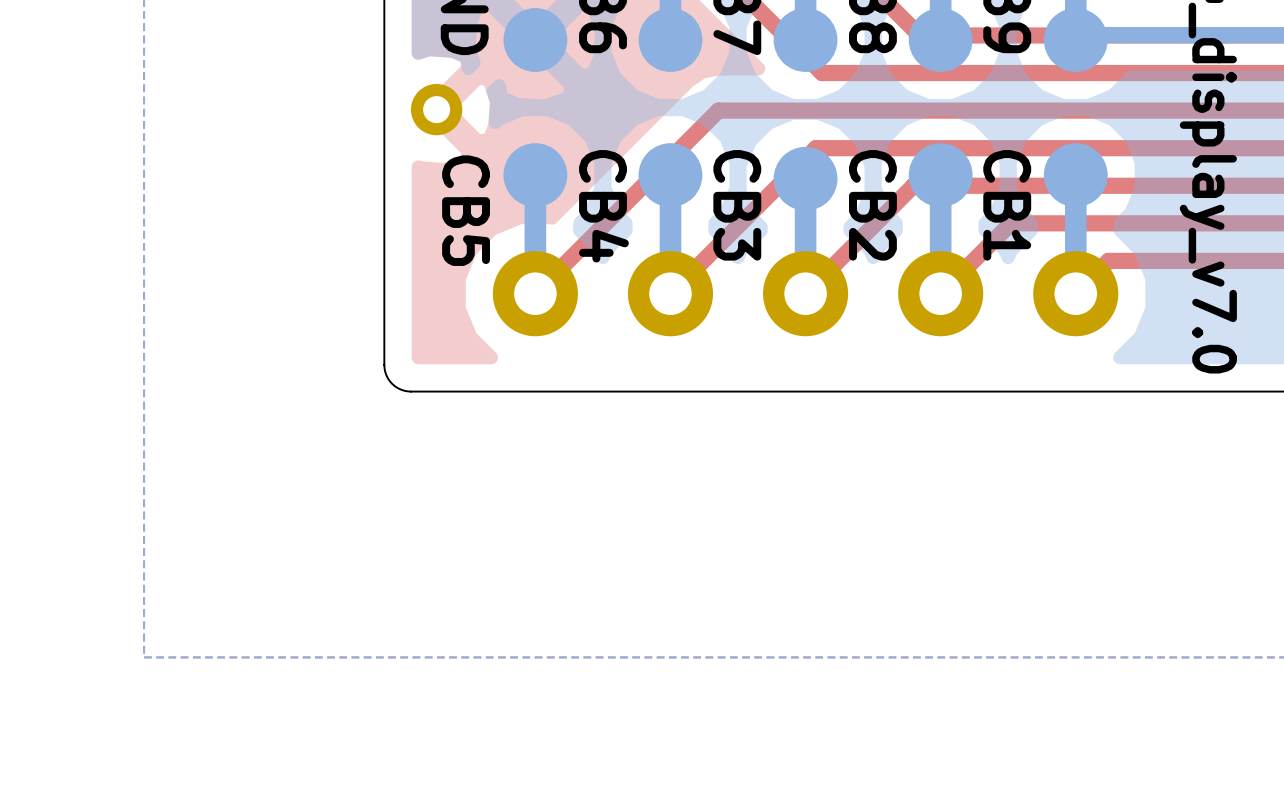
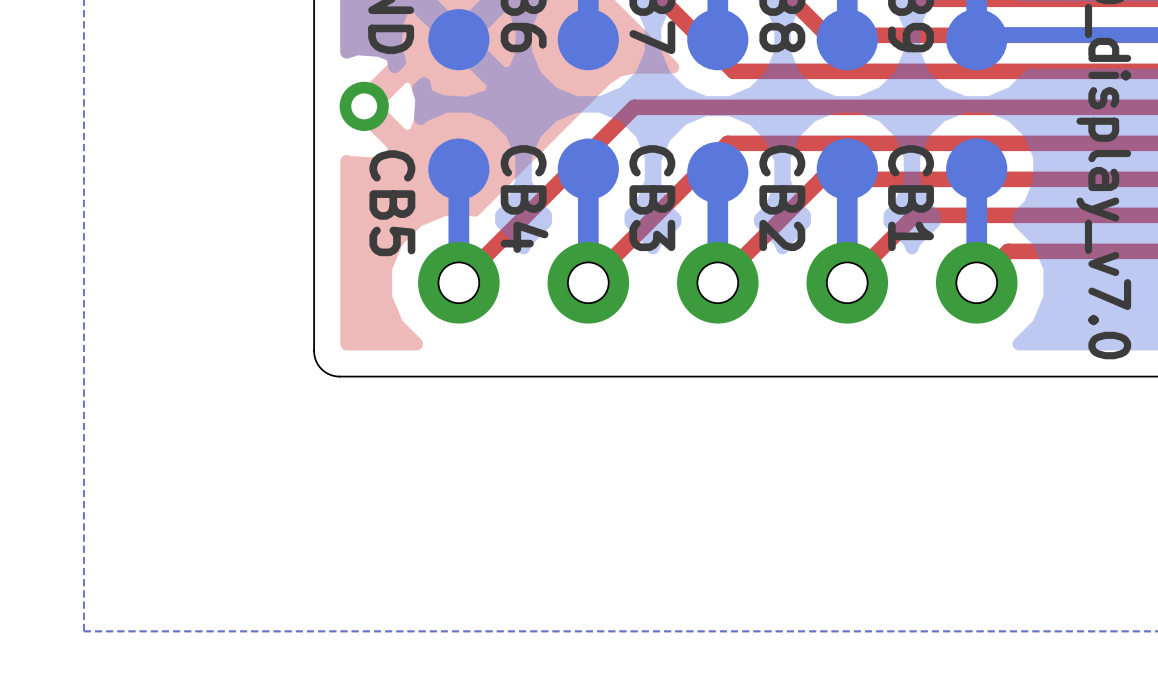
round board edge: none -> [438, 262, 480, 304]
round board edge: none -> [567, 262, 609, 304]
round board edge: none -> [697, 262, 739, 304]
round board edge: none -> [826, 262, 868, 304]
round board edge: none -> [956, 262, 998, 304]

